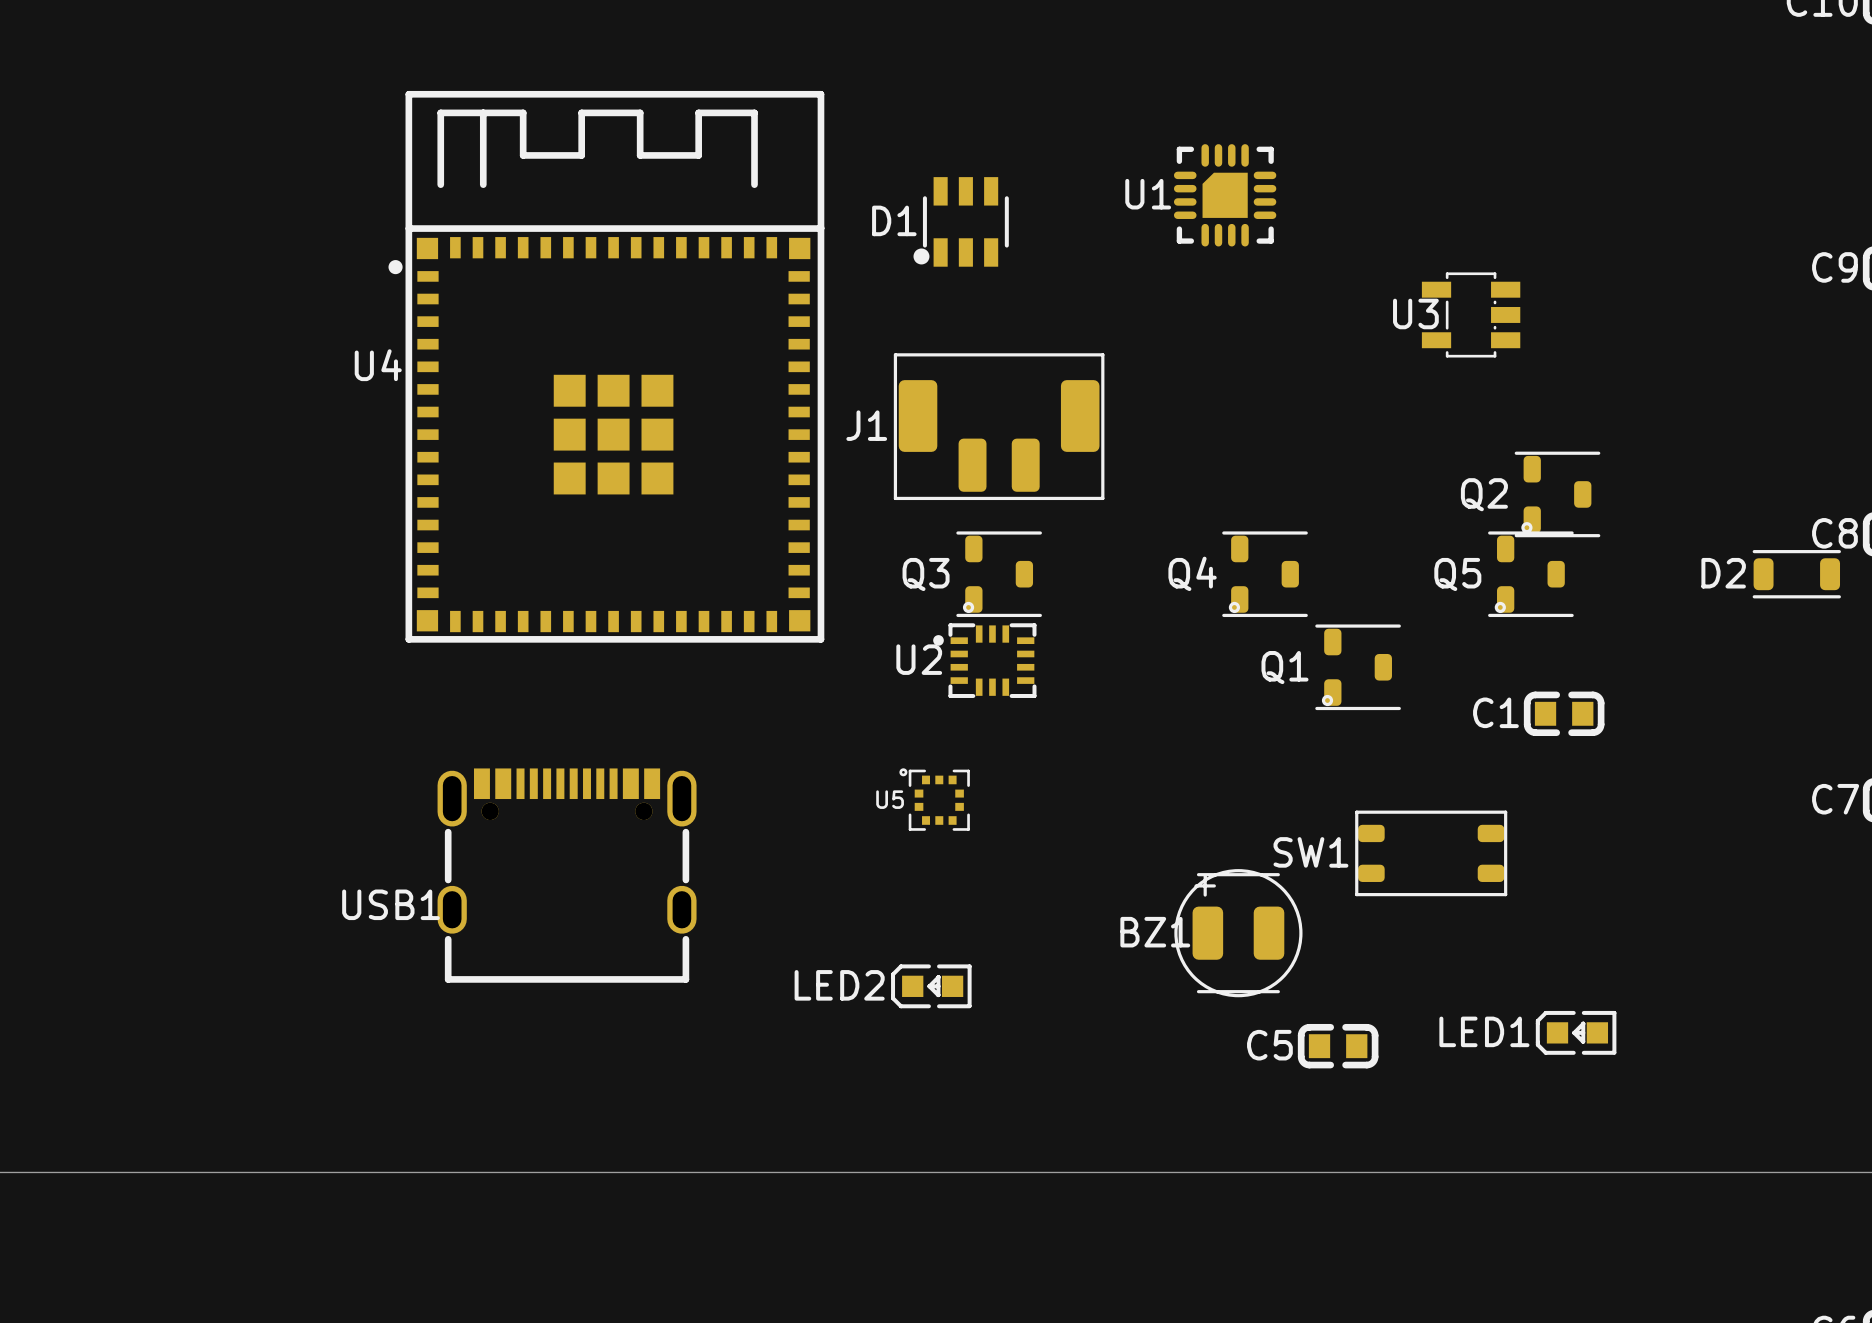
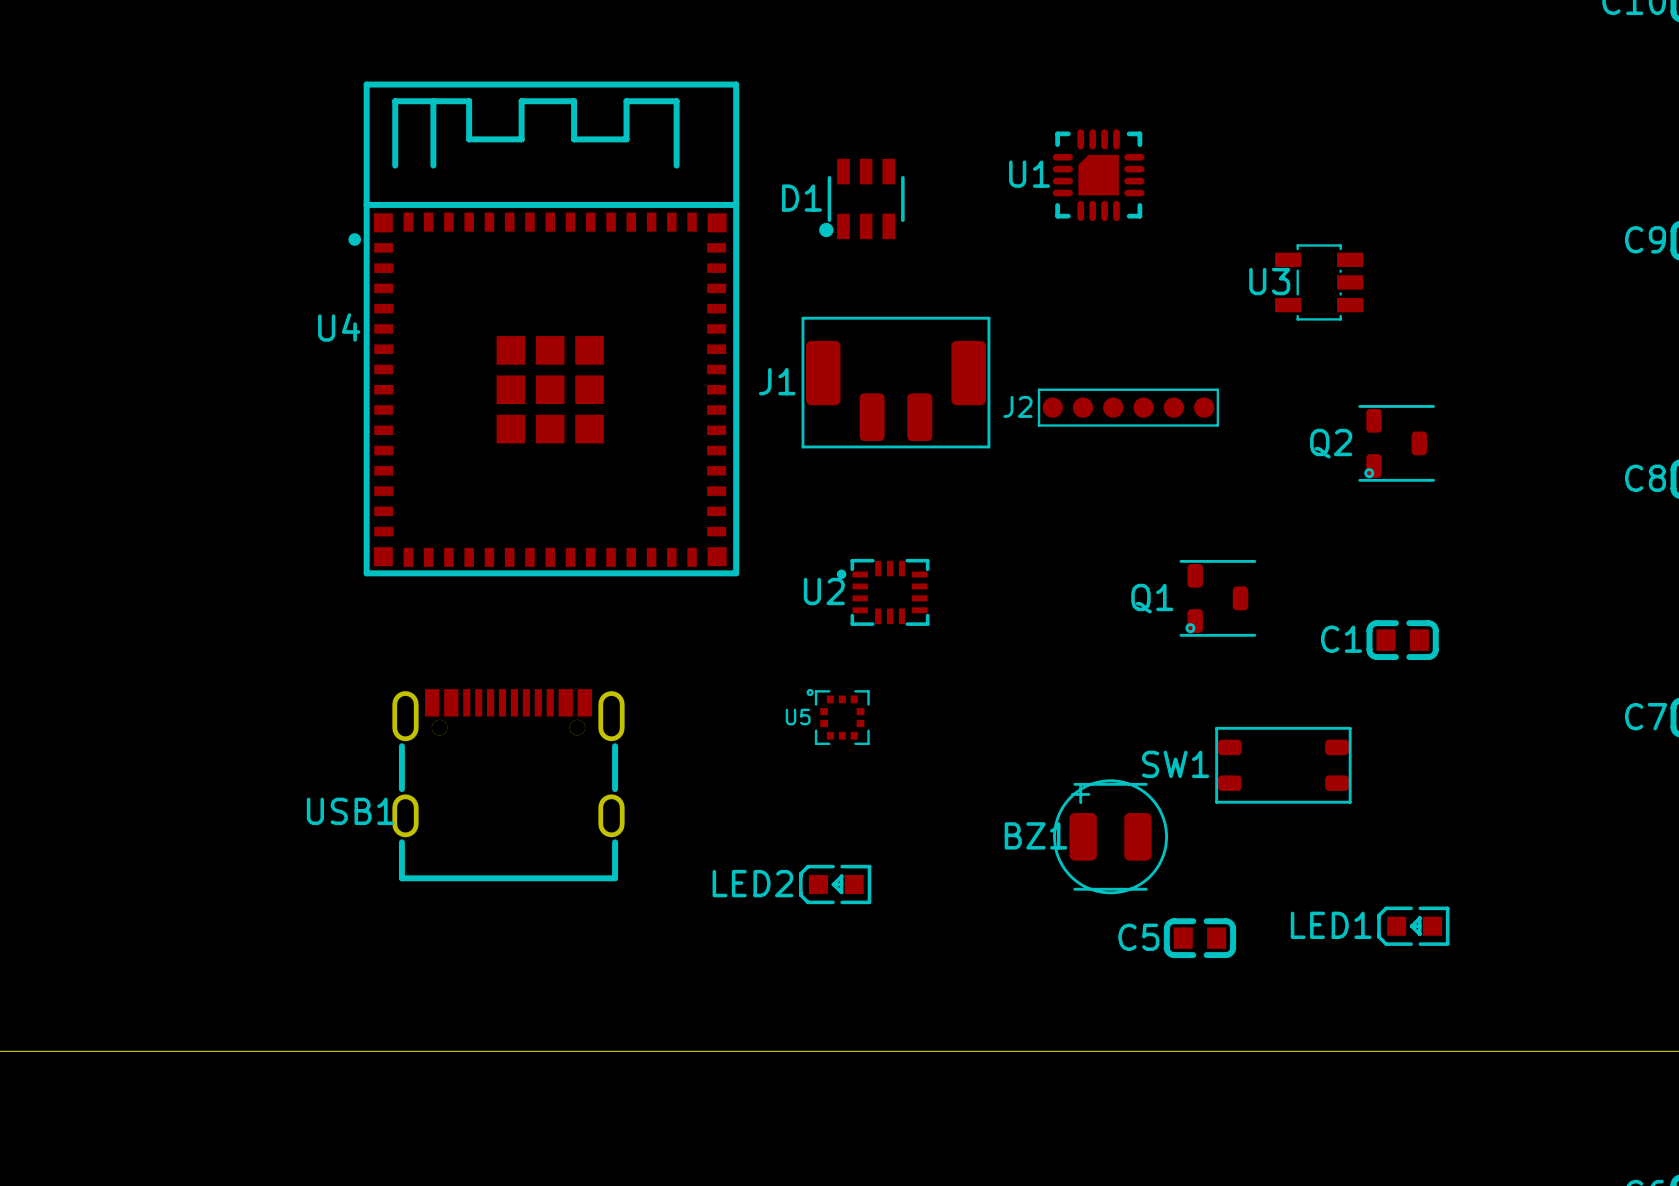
J2: none -> (1128, 407)
Q3: (999, 574) -> none
Q4: (1265, 574) -> none
Q5: (1530, 574) -> none
D2: (1796, 574) -> none

